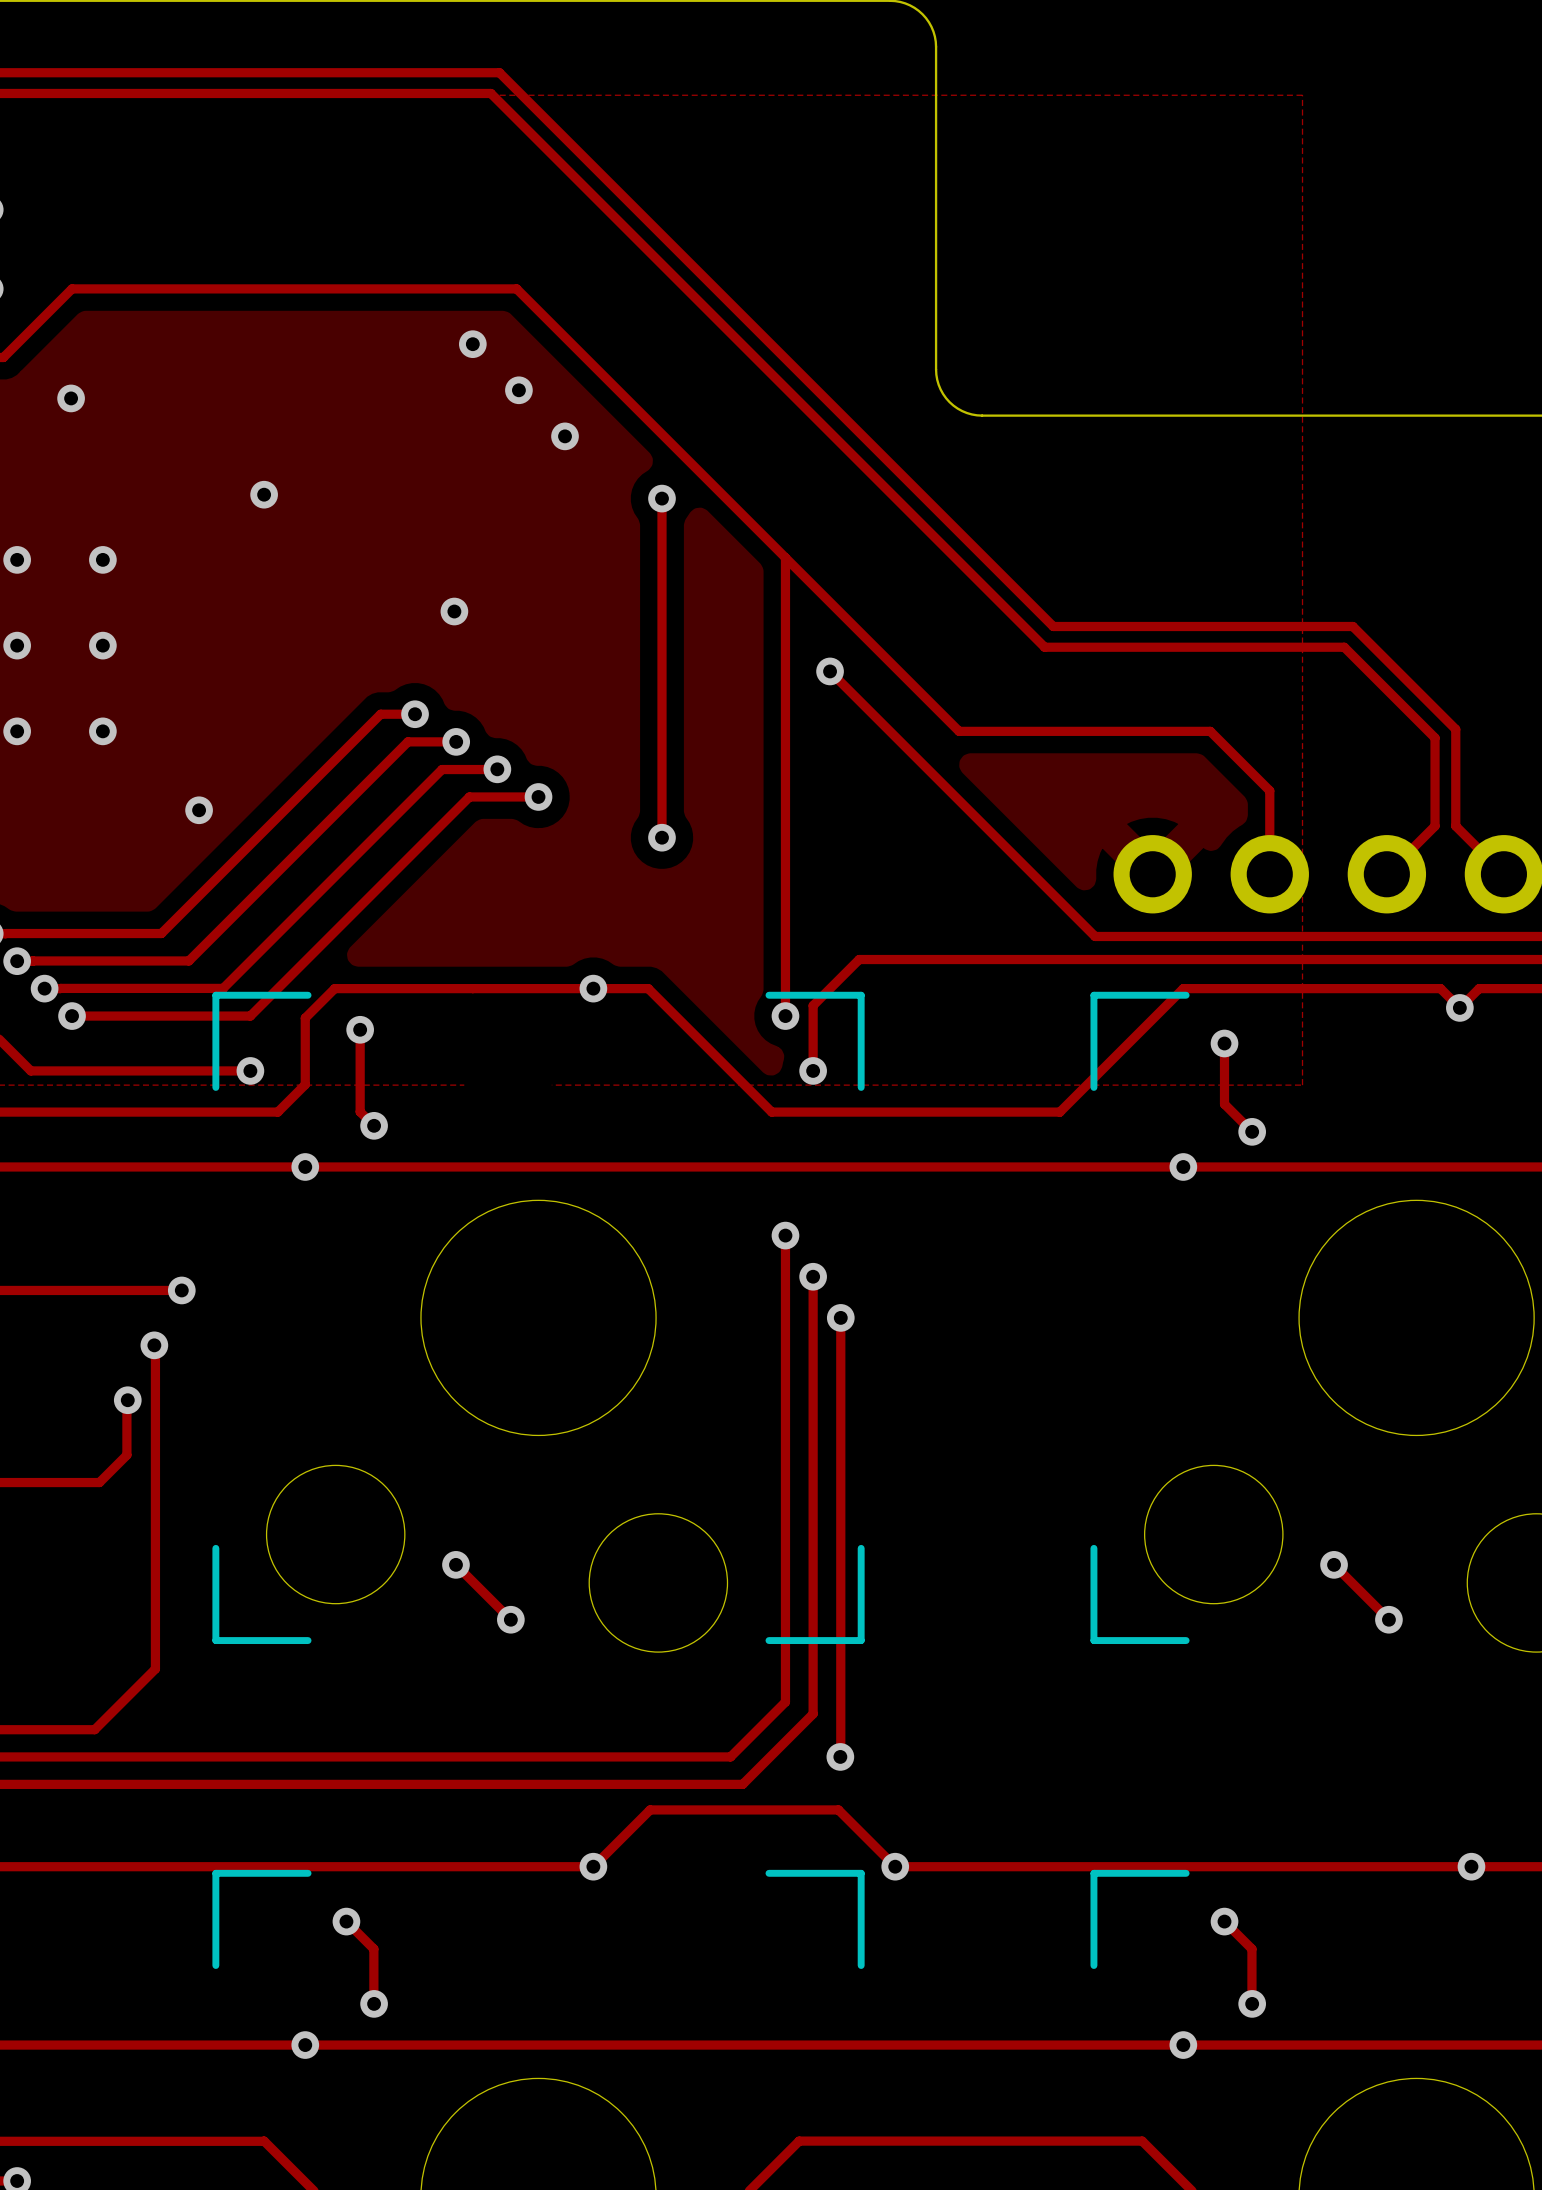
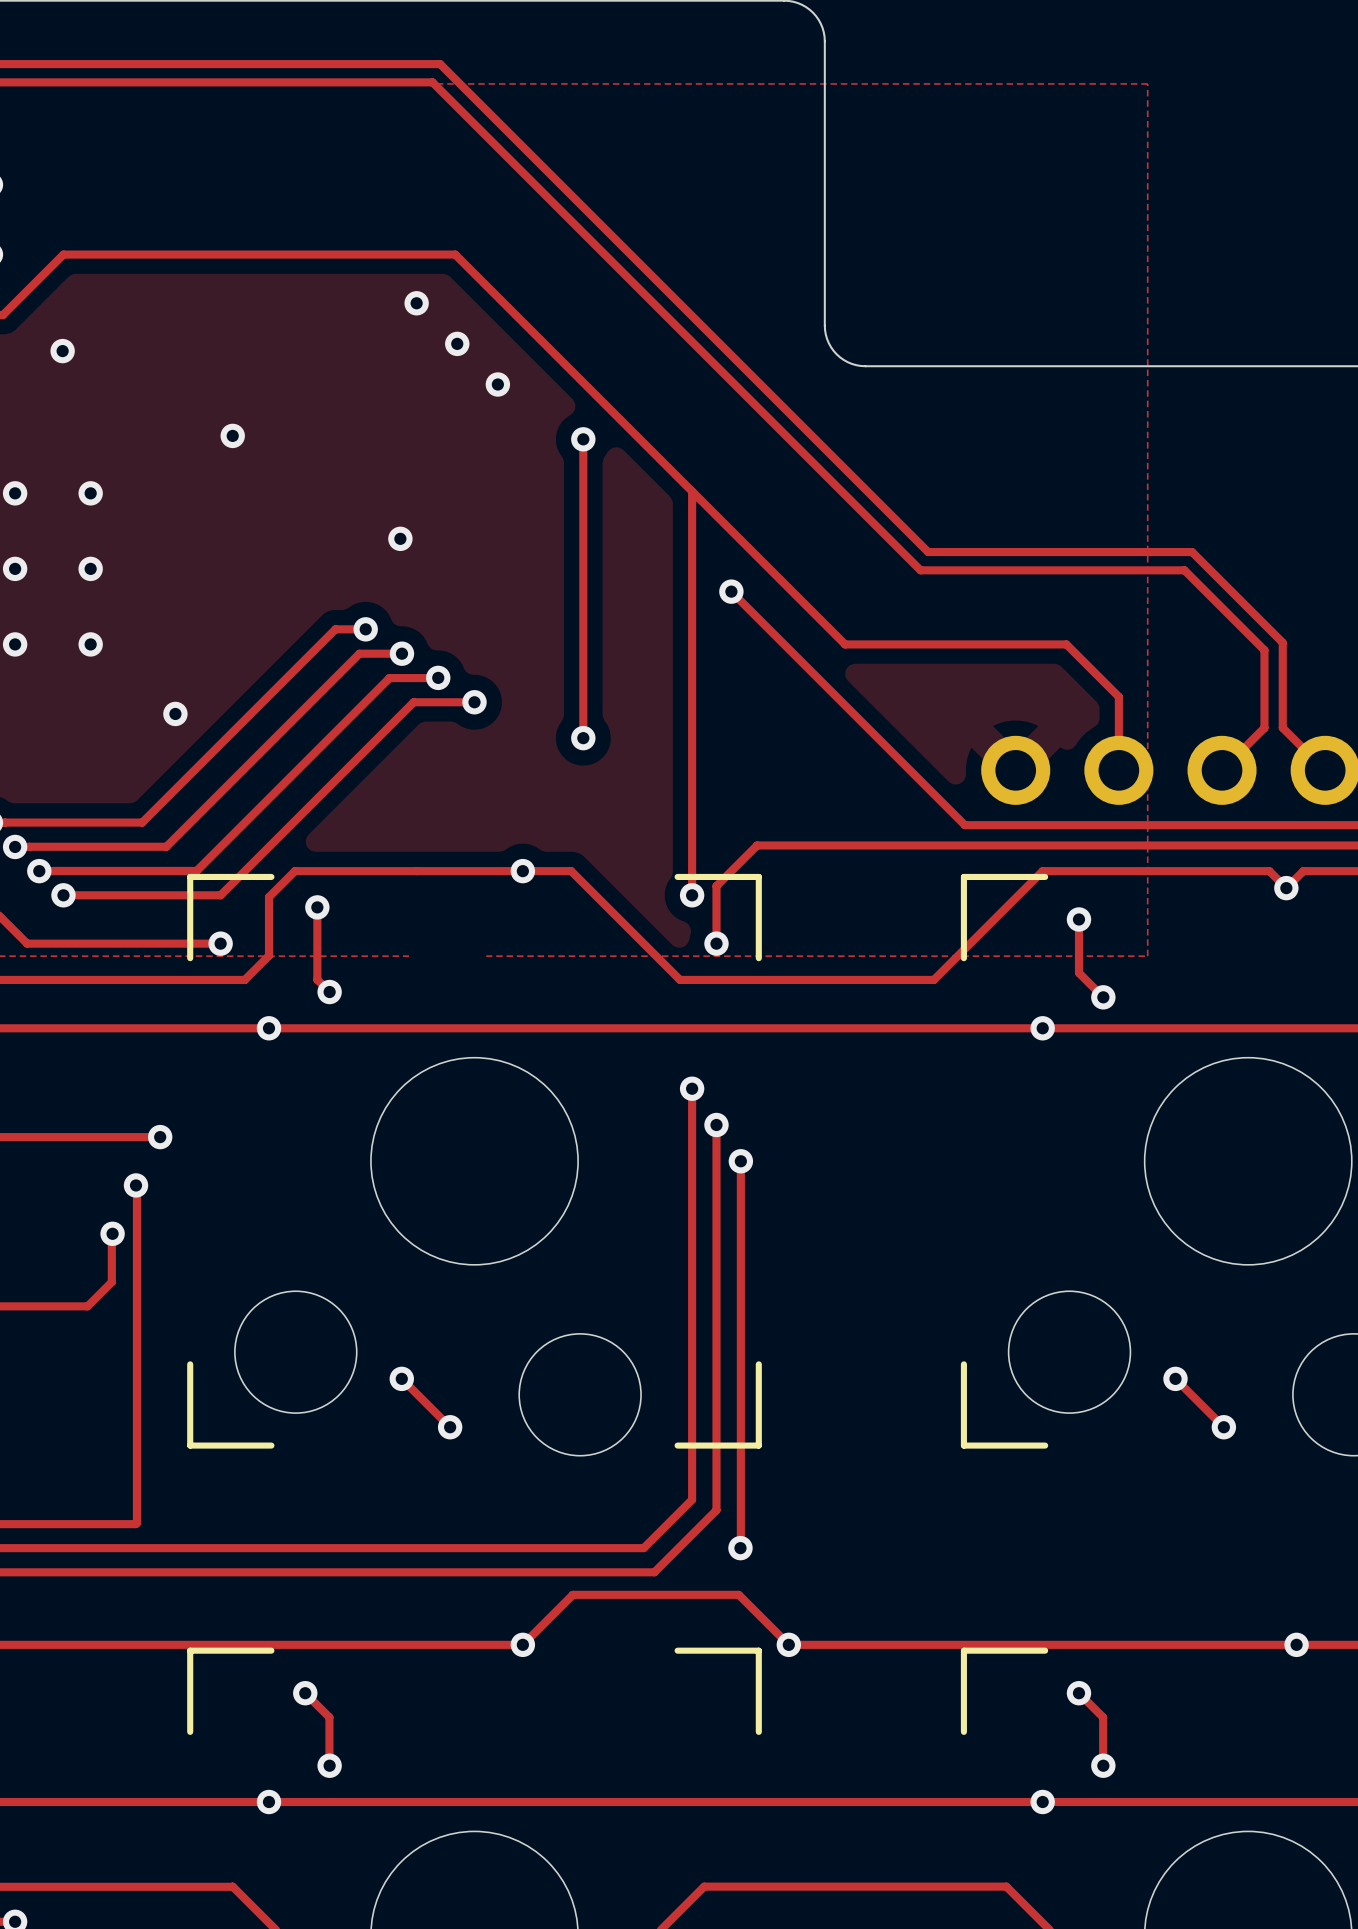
track: (155, 1669) (94, 1729) -> (136, 1470) (136, 1522) (83, 1524)

